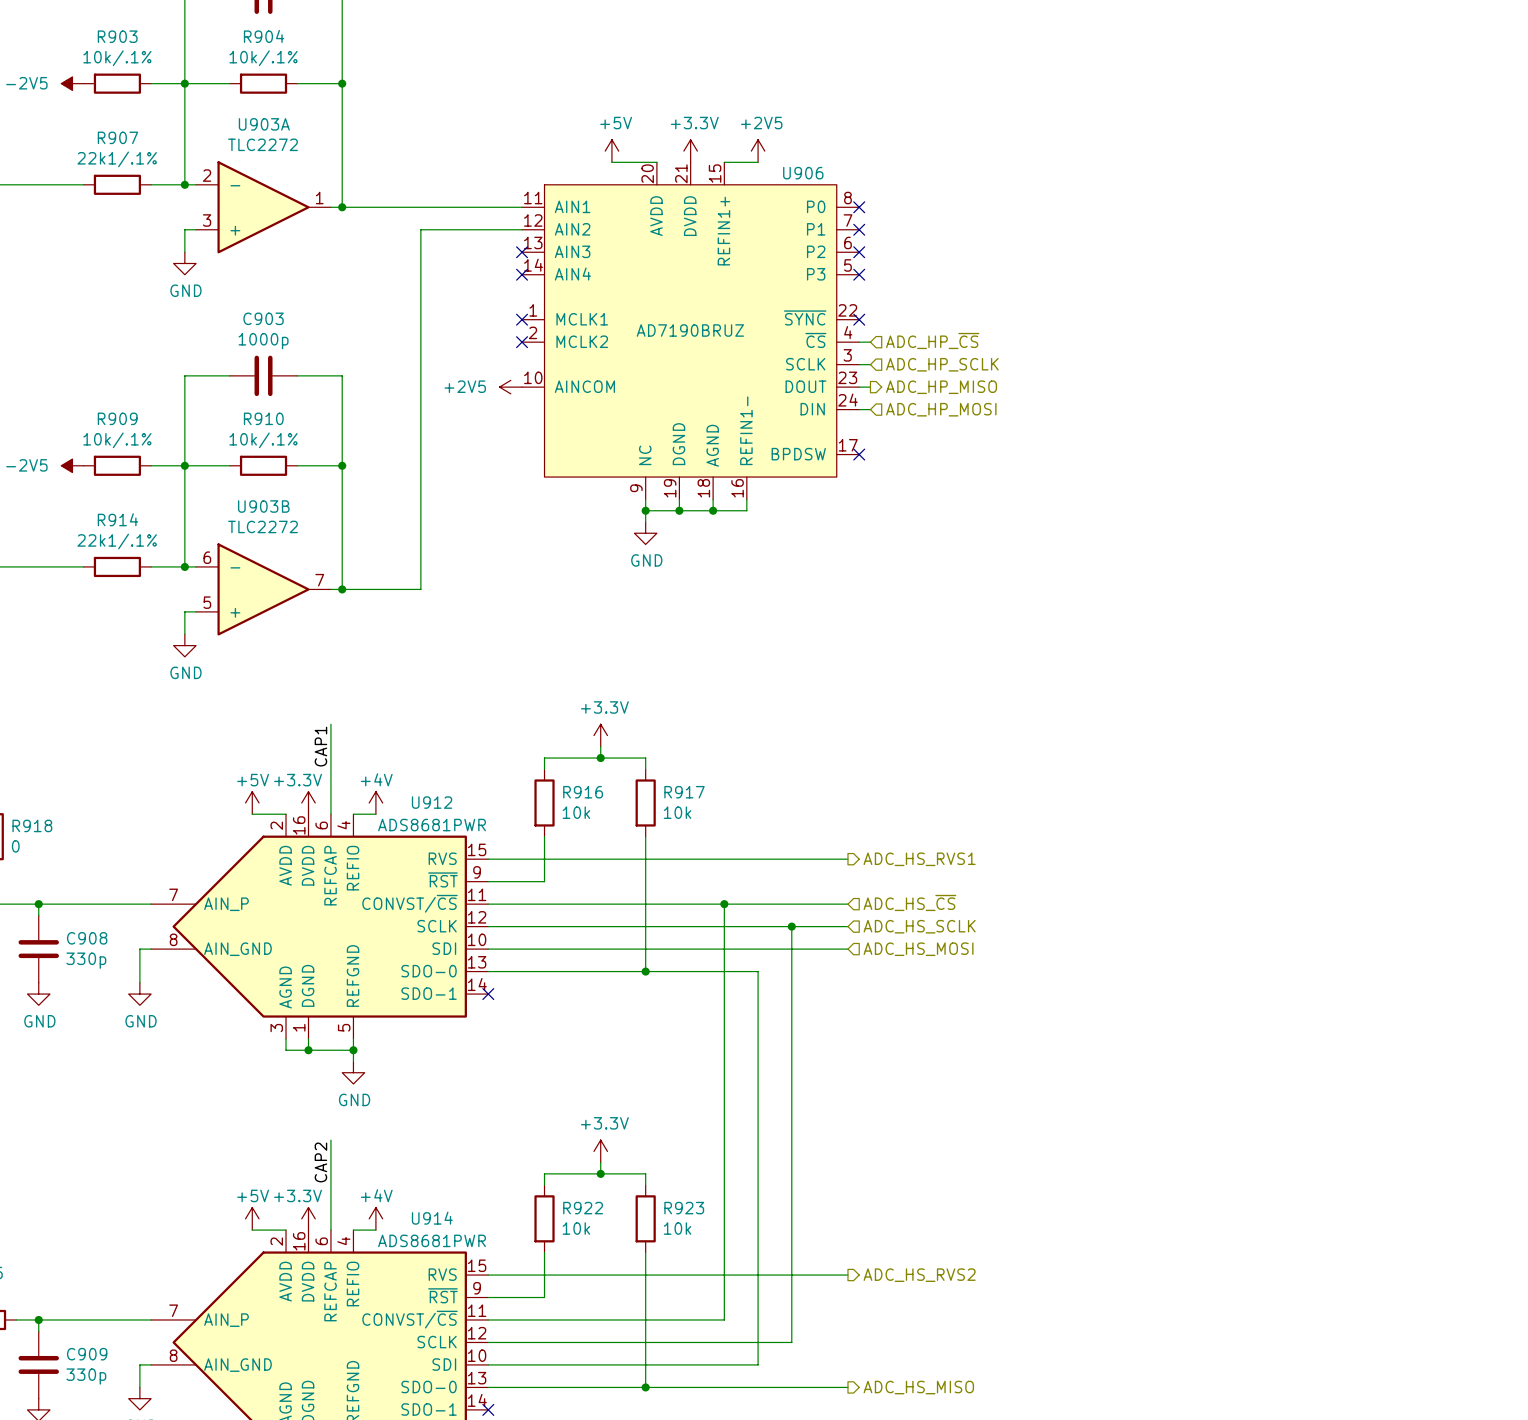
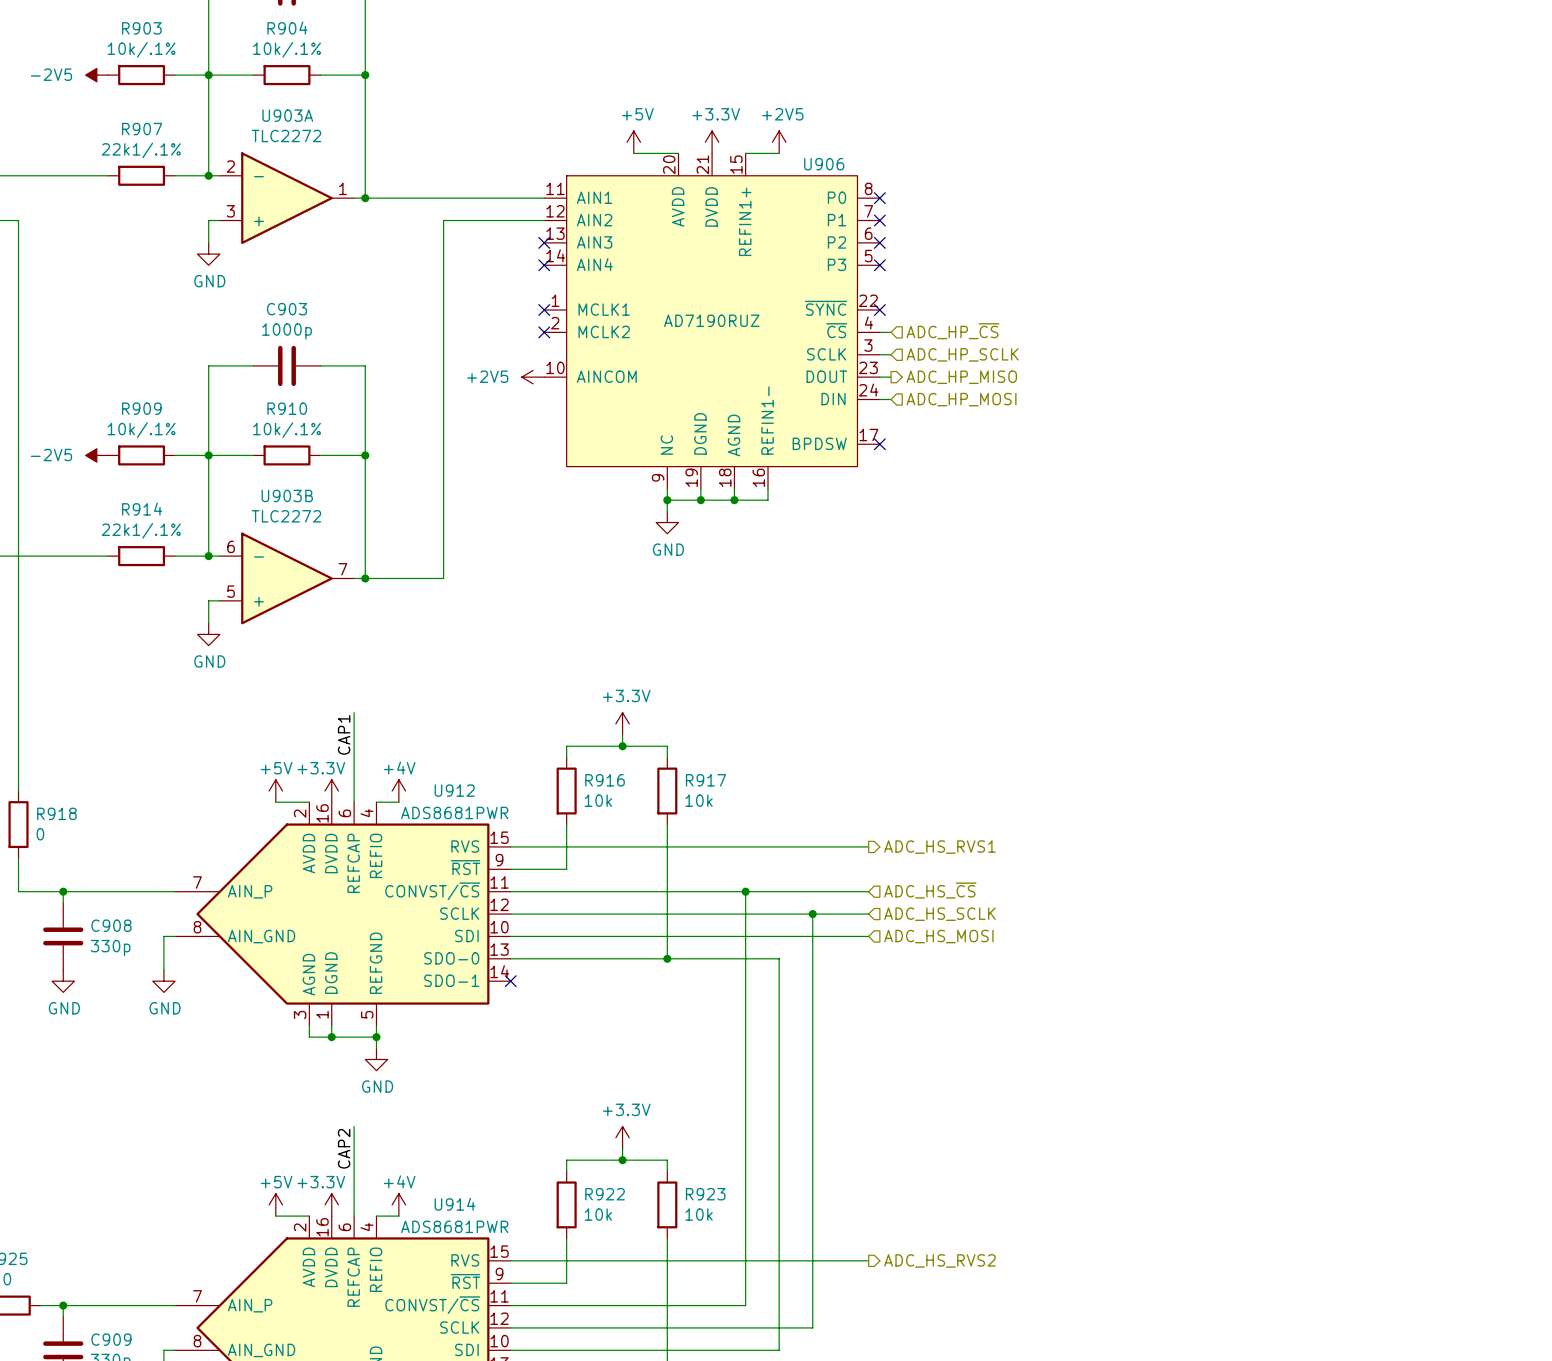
U906 value: AD7190BRUZ (690, 330) -> AD7190RUZ (711, 320)

